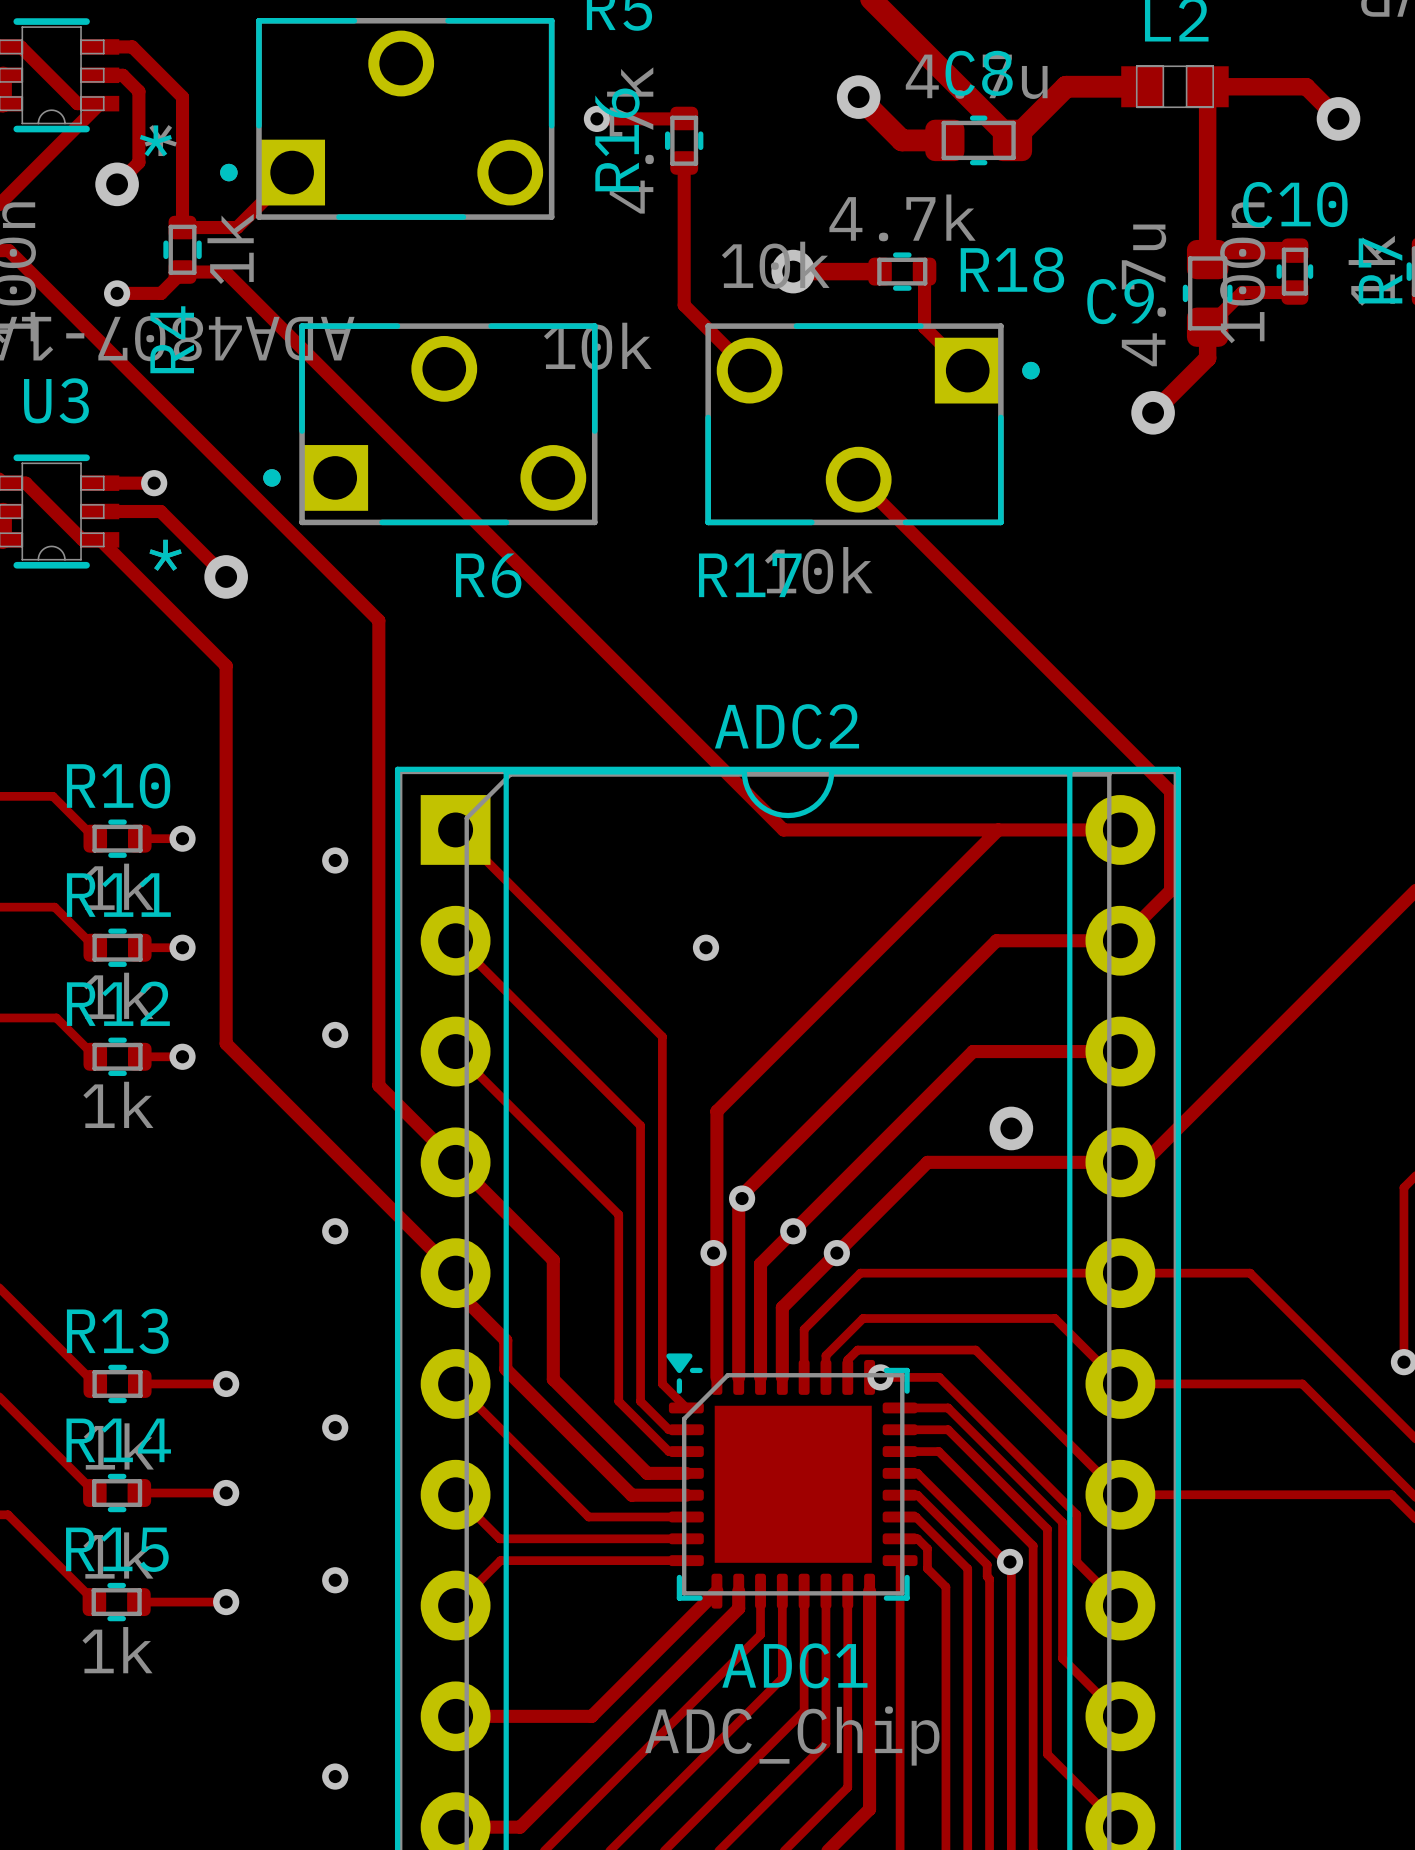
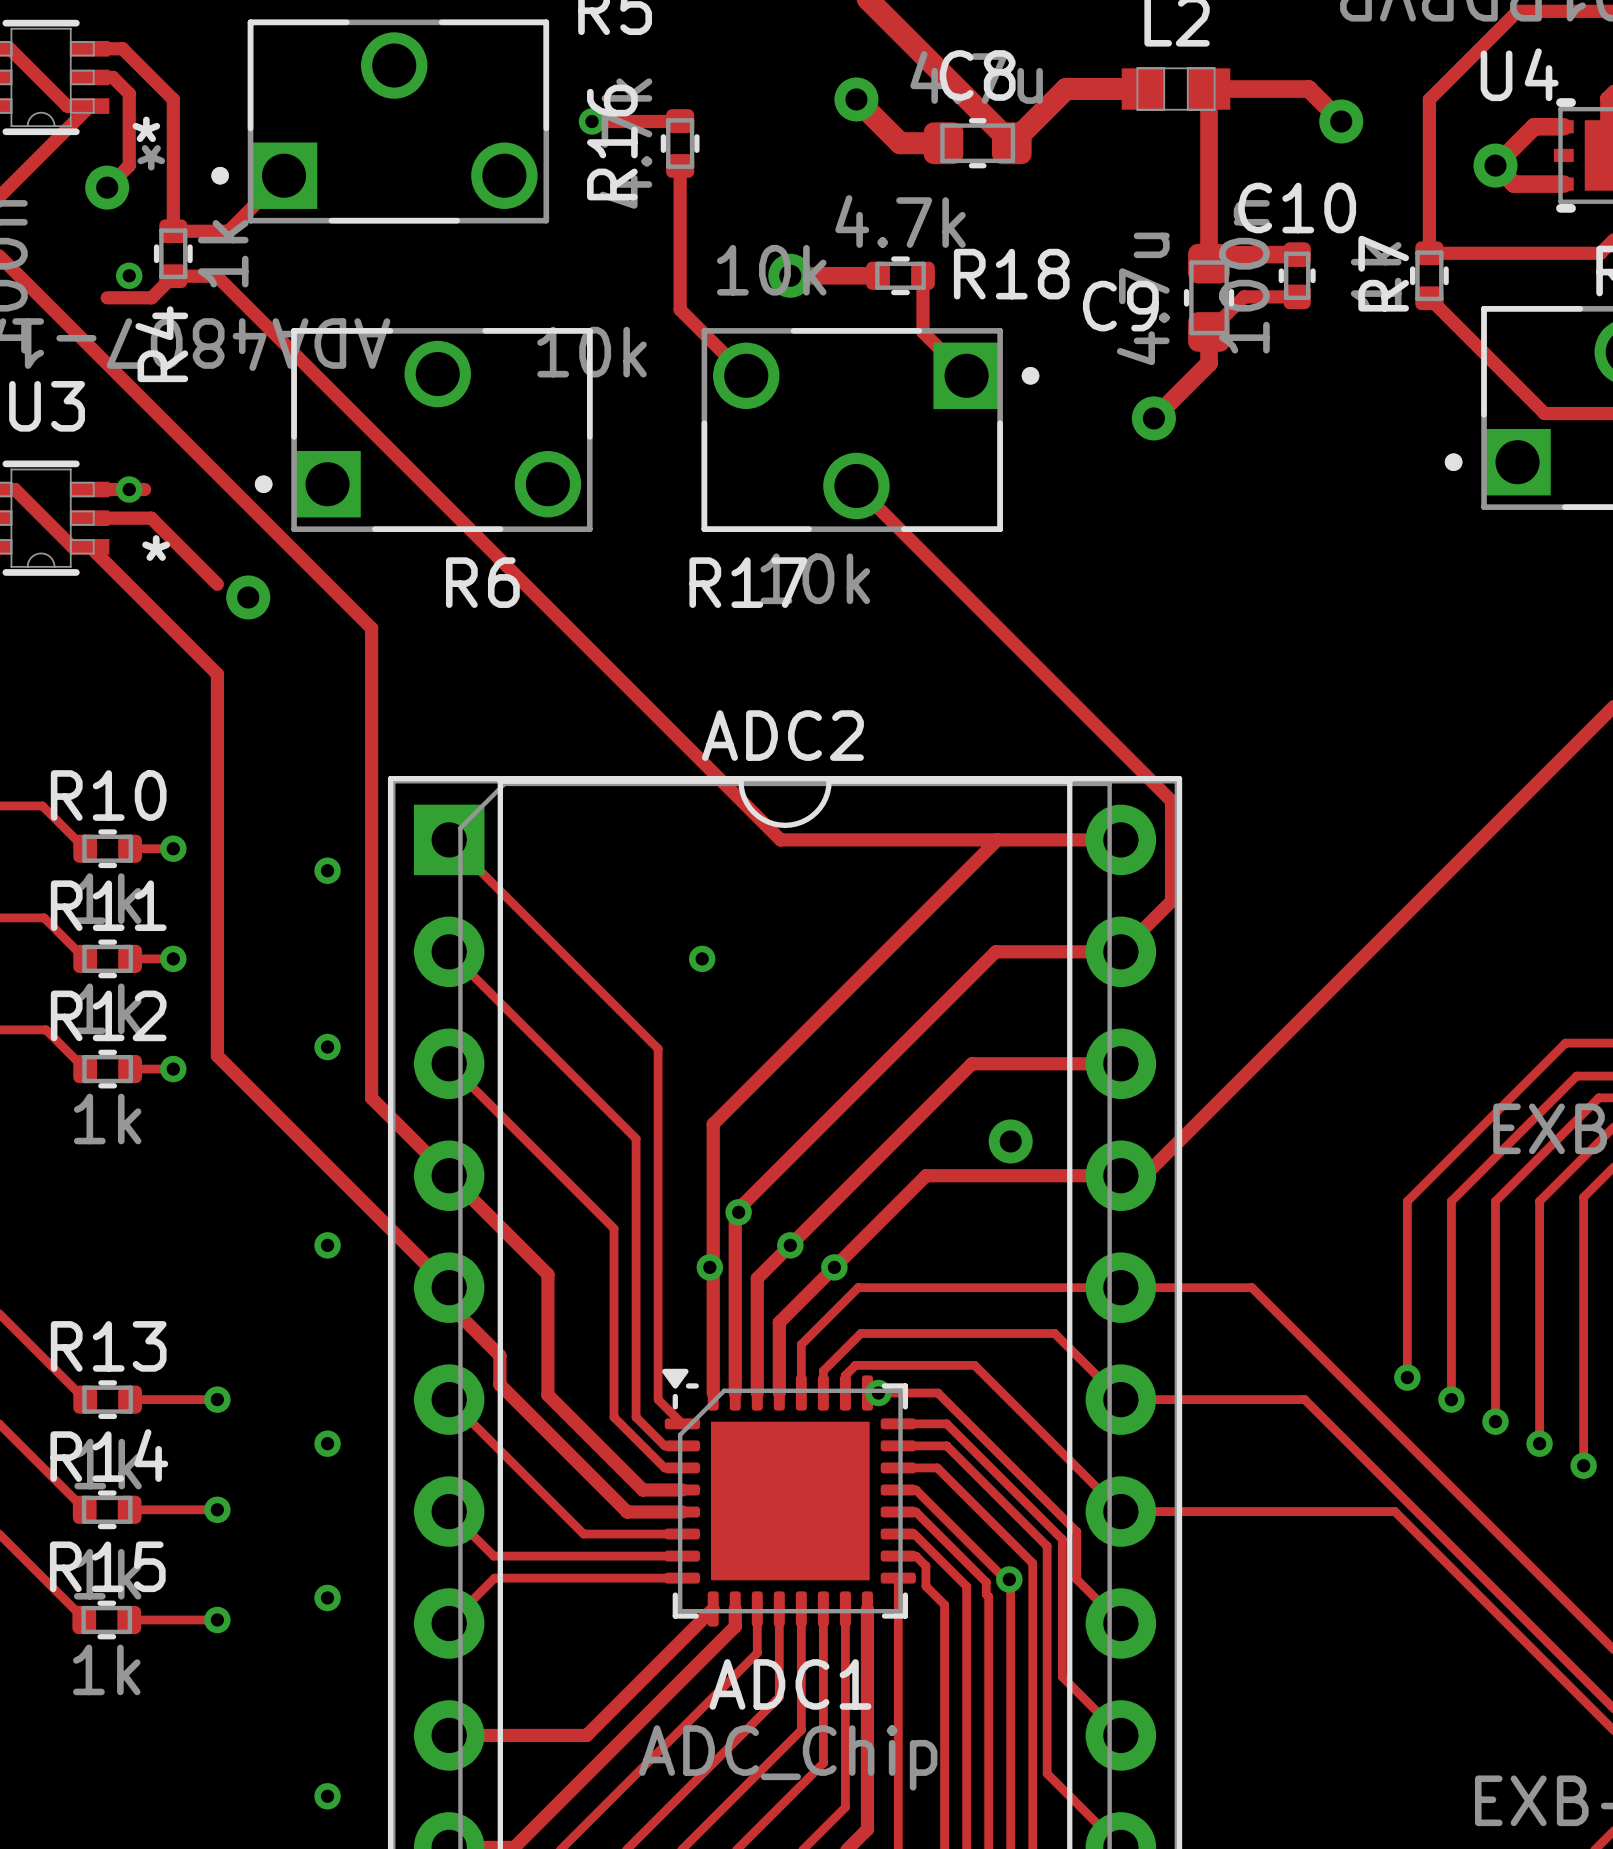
via position: (117, 293) -> (129, 275)
via position: (154, 483) -> (129, 489)
via position: (226, 576) -> (248, 597)

